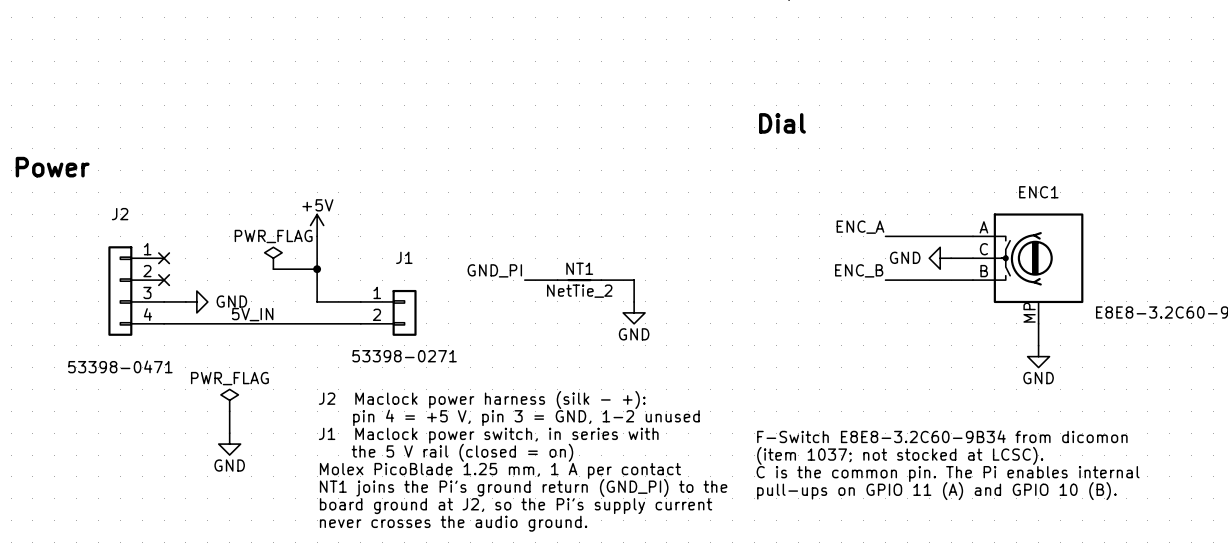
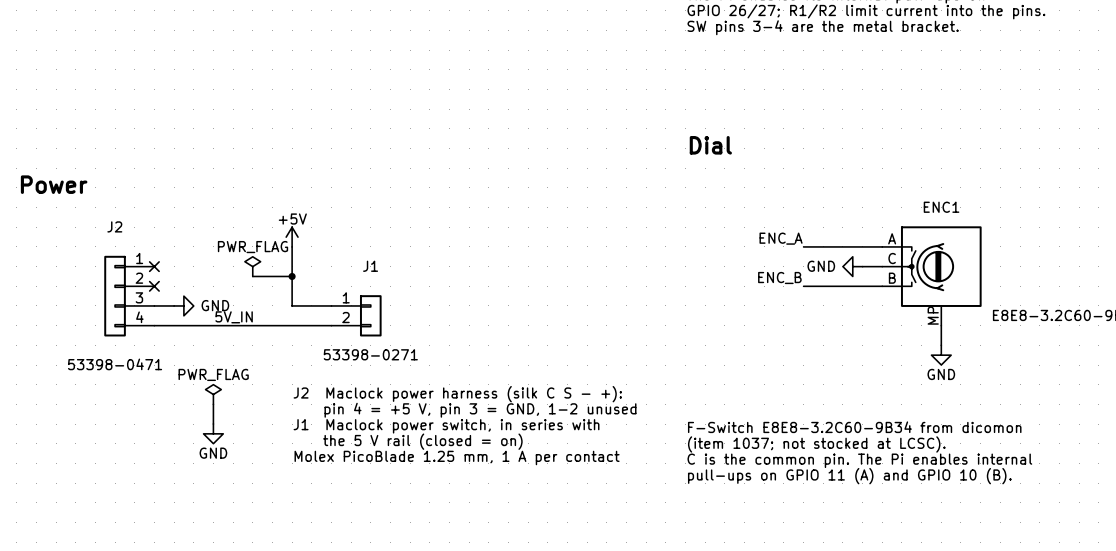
label: GND_PI (494, 270) -> none
wire: (524, 280) (557, 280) -> none
NT1: NetTie_2 (579, 280) -> none
wire: (601, 280) (634, 280) (634, 301) -> none
power symbol: GND (634, 312) -> none
text: J2 Maclock power harness (silk - +): (482, 399) -> J2 Maclock power harness (silk C S - +): (457, 394)
text: NT1 joins the Pi's ground return (GND_PI) to the (523, 487) -> none
text: board ground at J2, so the Pi's supply current (516, 506) -> none
text: never crosses the audio ground. (453, 523) -> none

